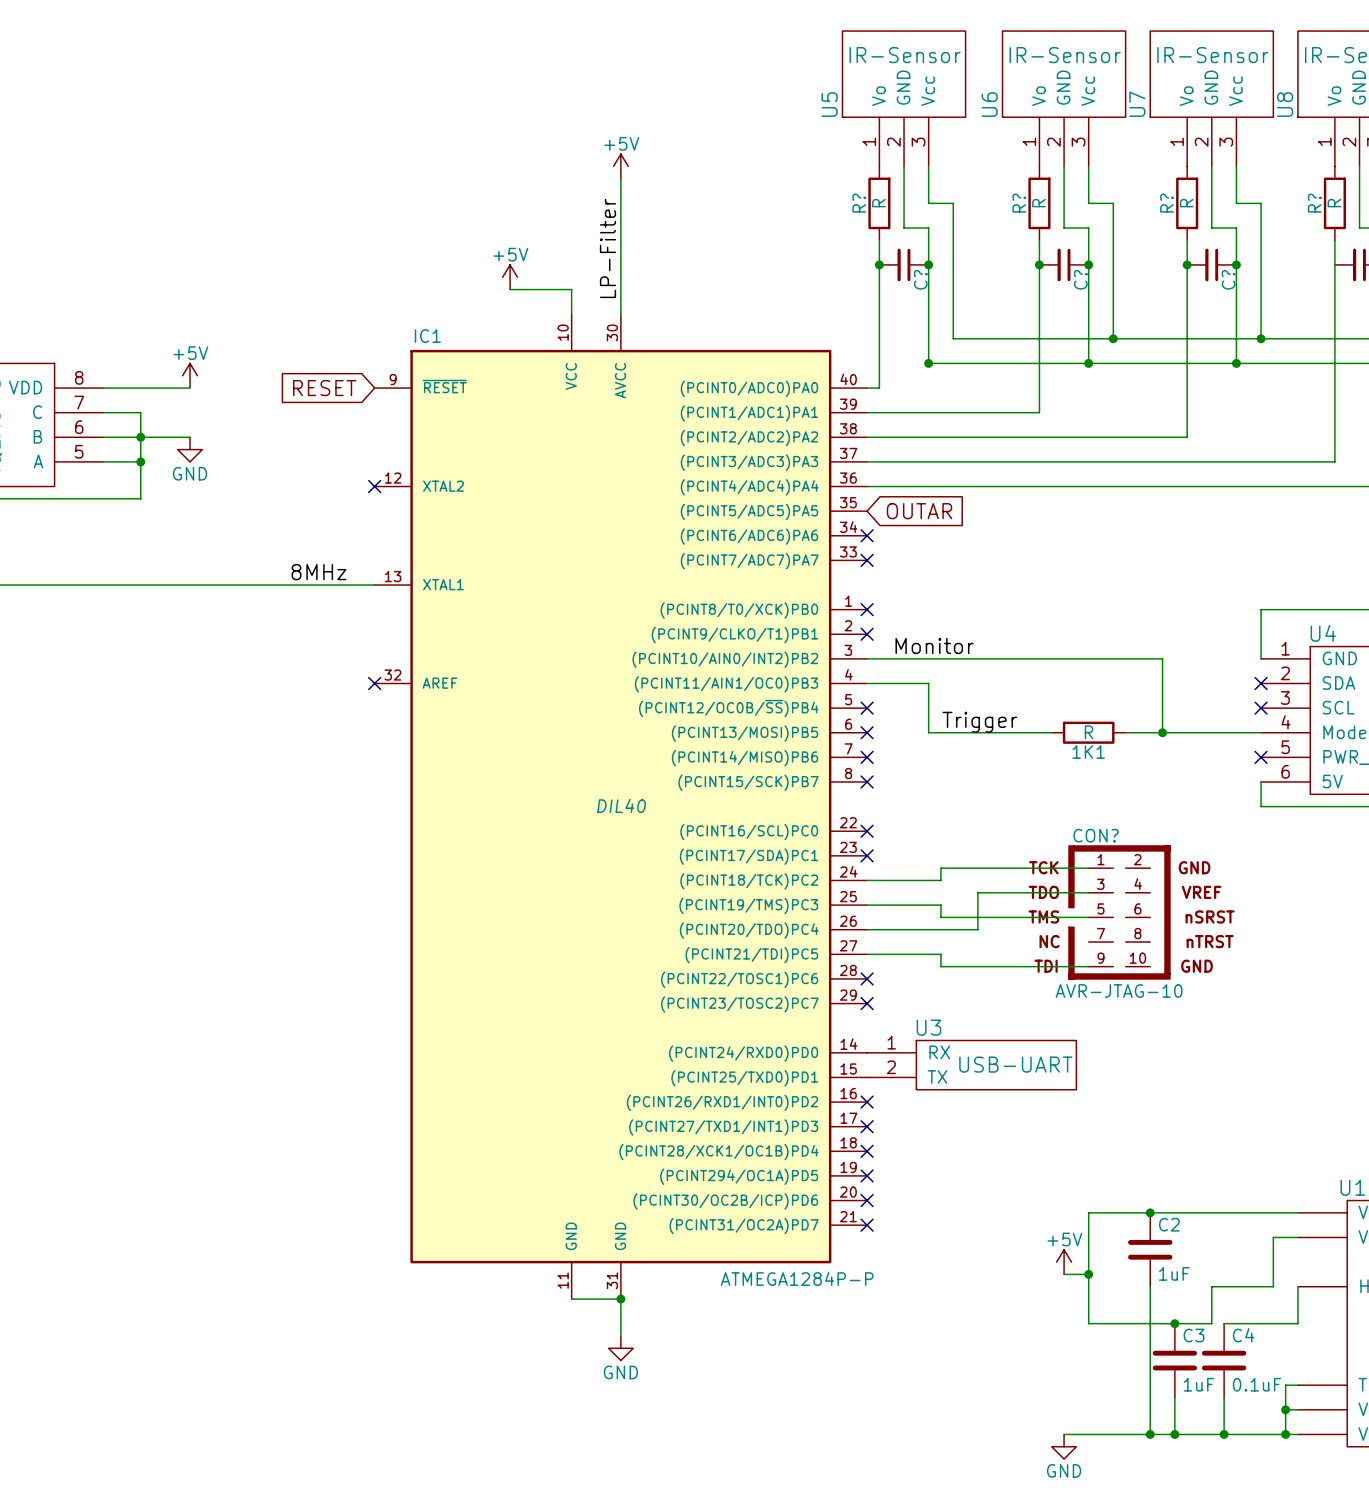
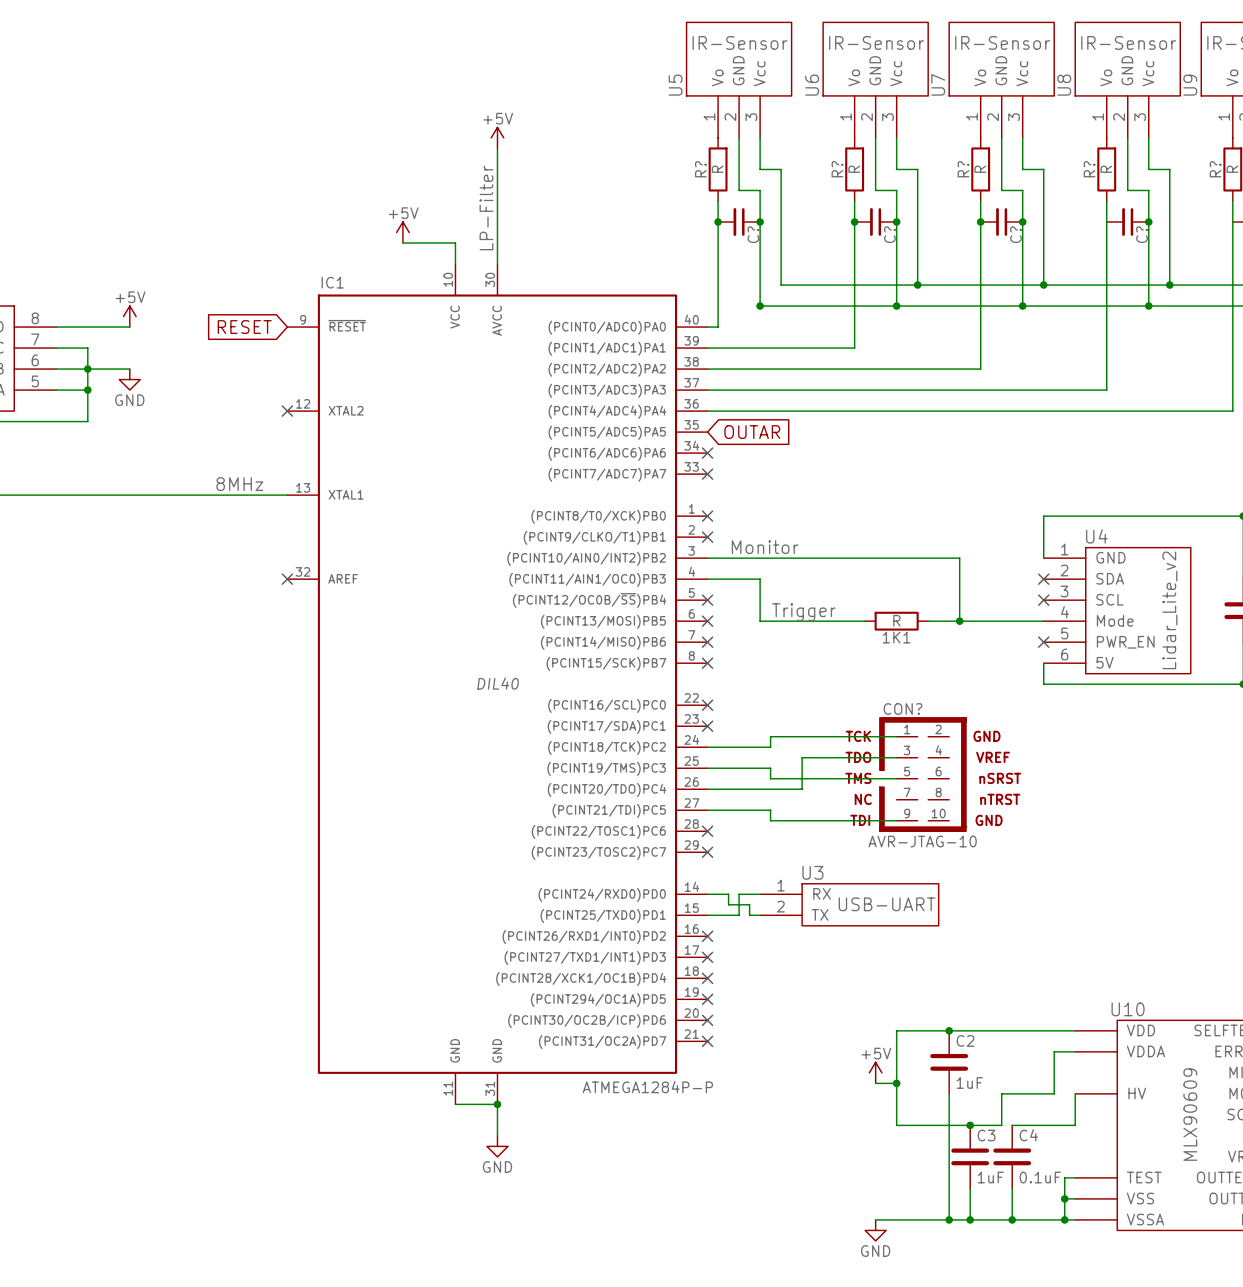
wire: none -> (707, 894) (728, 894) (728, 904) (749, 904) (749, 915) (760, 915)
wire: none -> (760, 894) (739, 894) (739, 915) (707, 915)
U3 position: (971, 1065) -> (849, 904)

